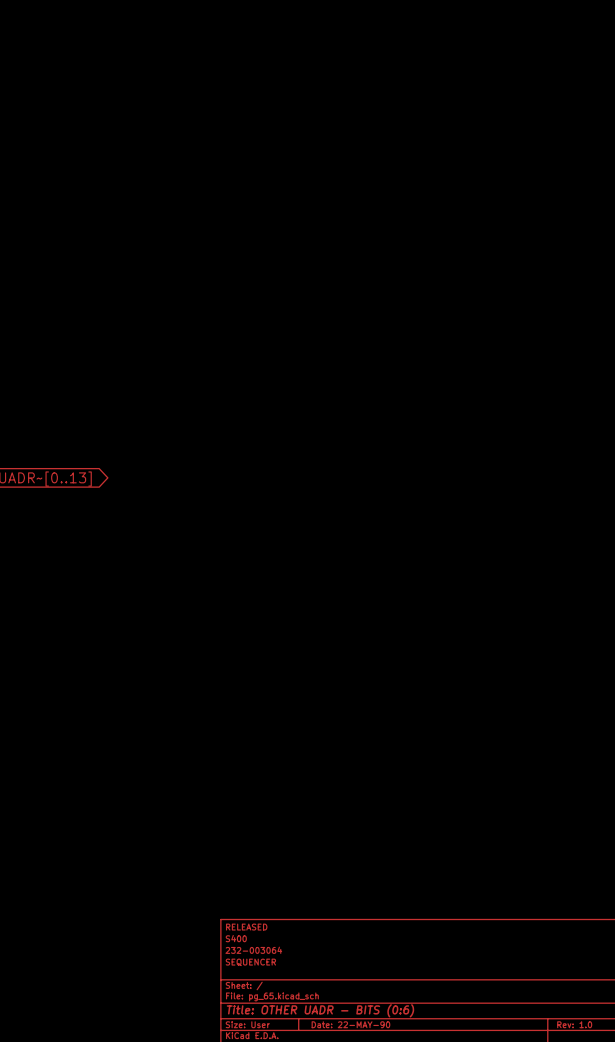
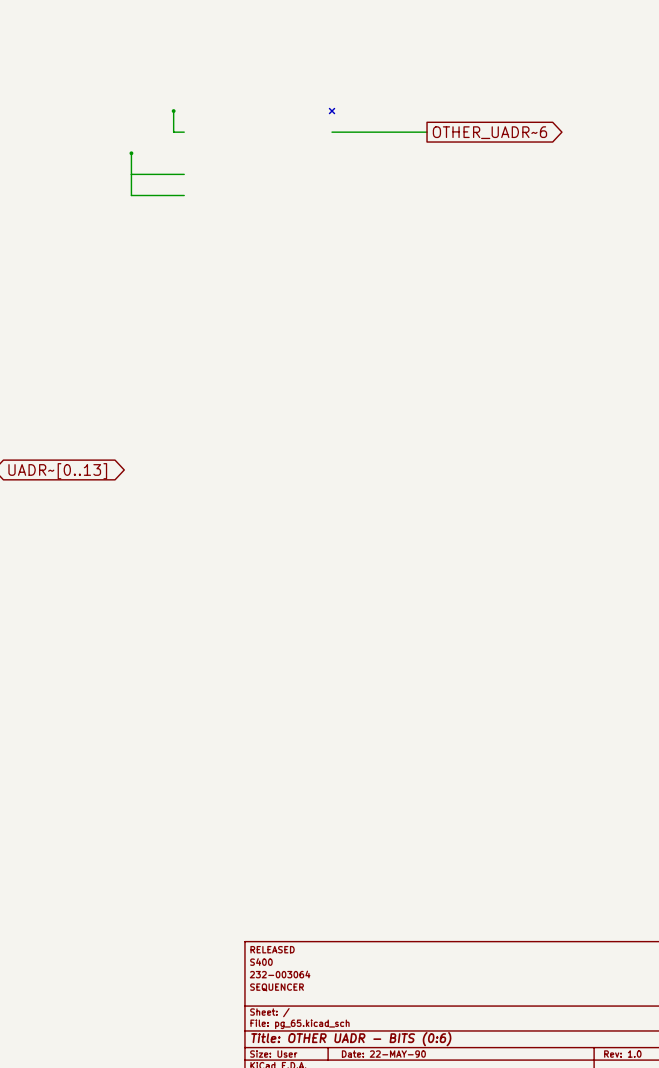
wire: none -> (173, 111) (173, 132) (184, 132)
junction: none -> (173, 111)
no-connect mark: none -> (332, 111)
wire: none -> (332, 132) (427, 132)
global label: none -> OTHER_UADR~6 (489, 132)
wire: none -> (131, 153) (131, 195) (184, 195)
junction: none -> (131, 153)
wire: none -> (131, 174) (184, 174)

